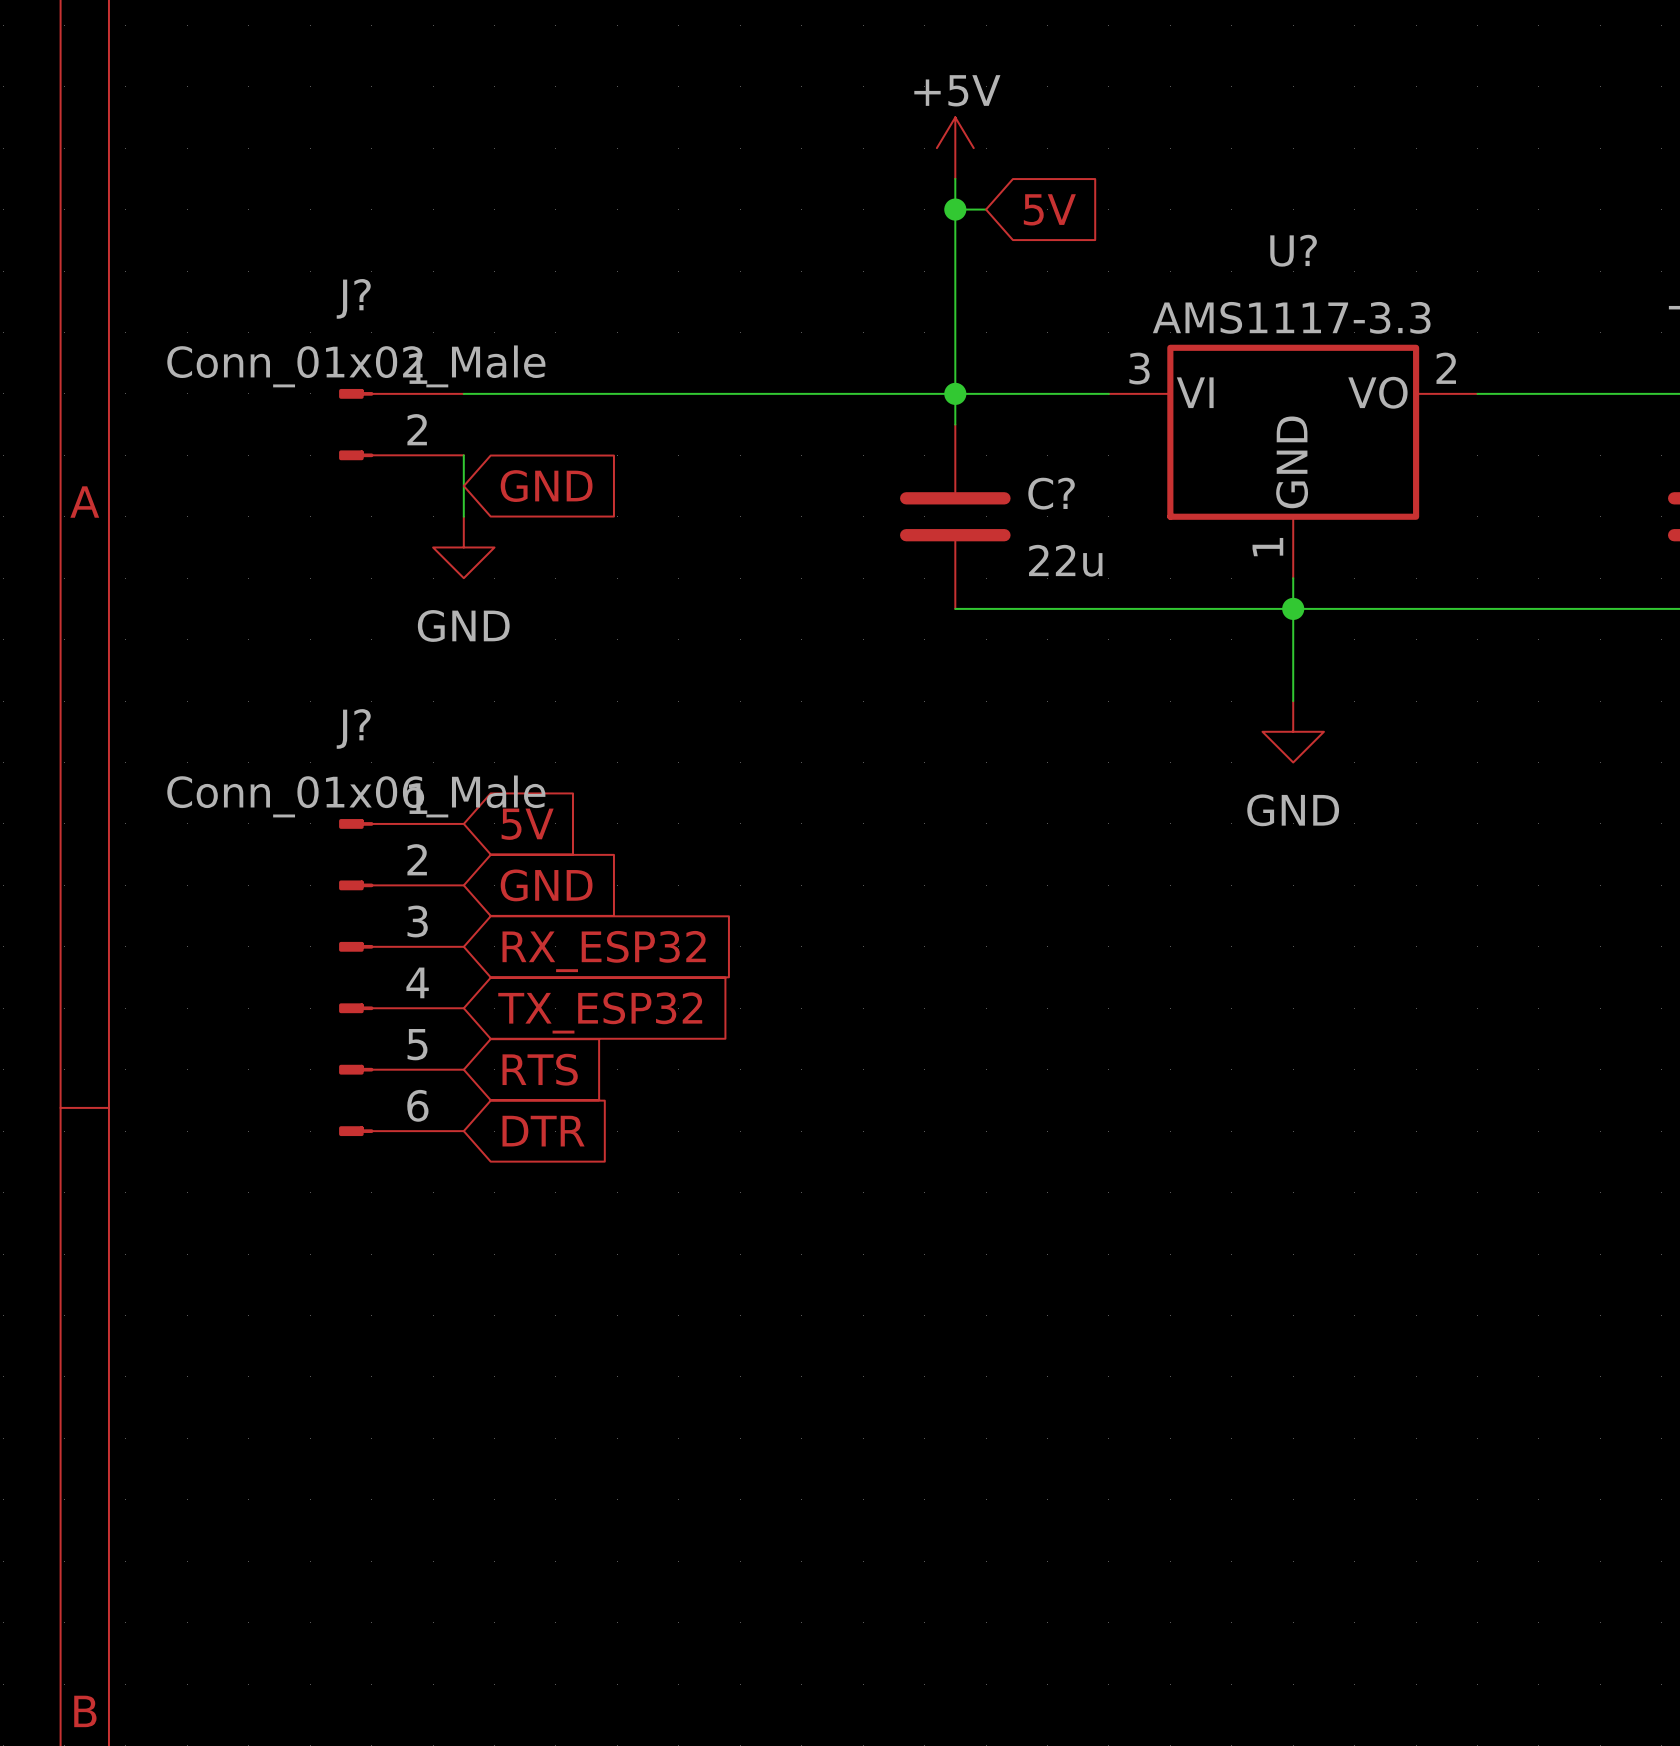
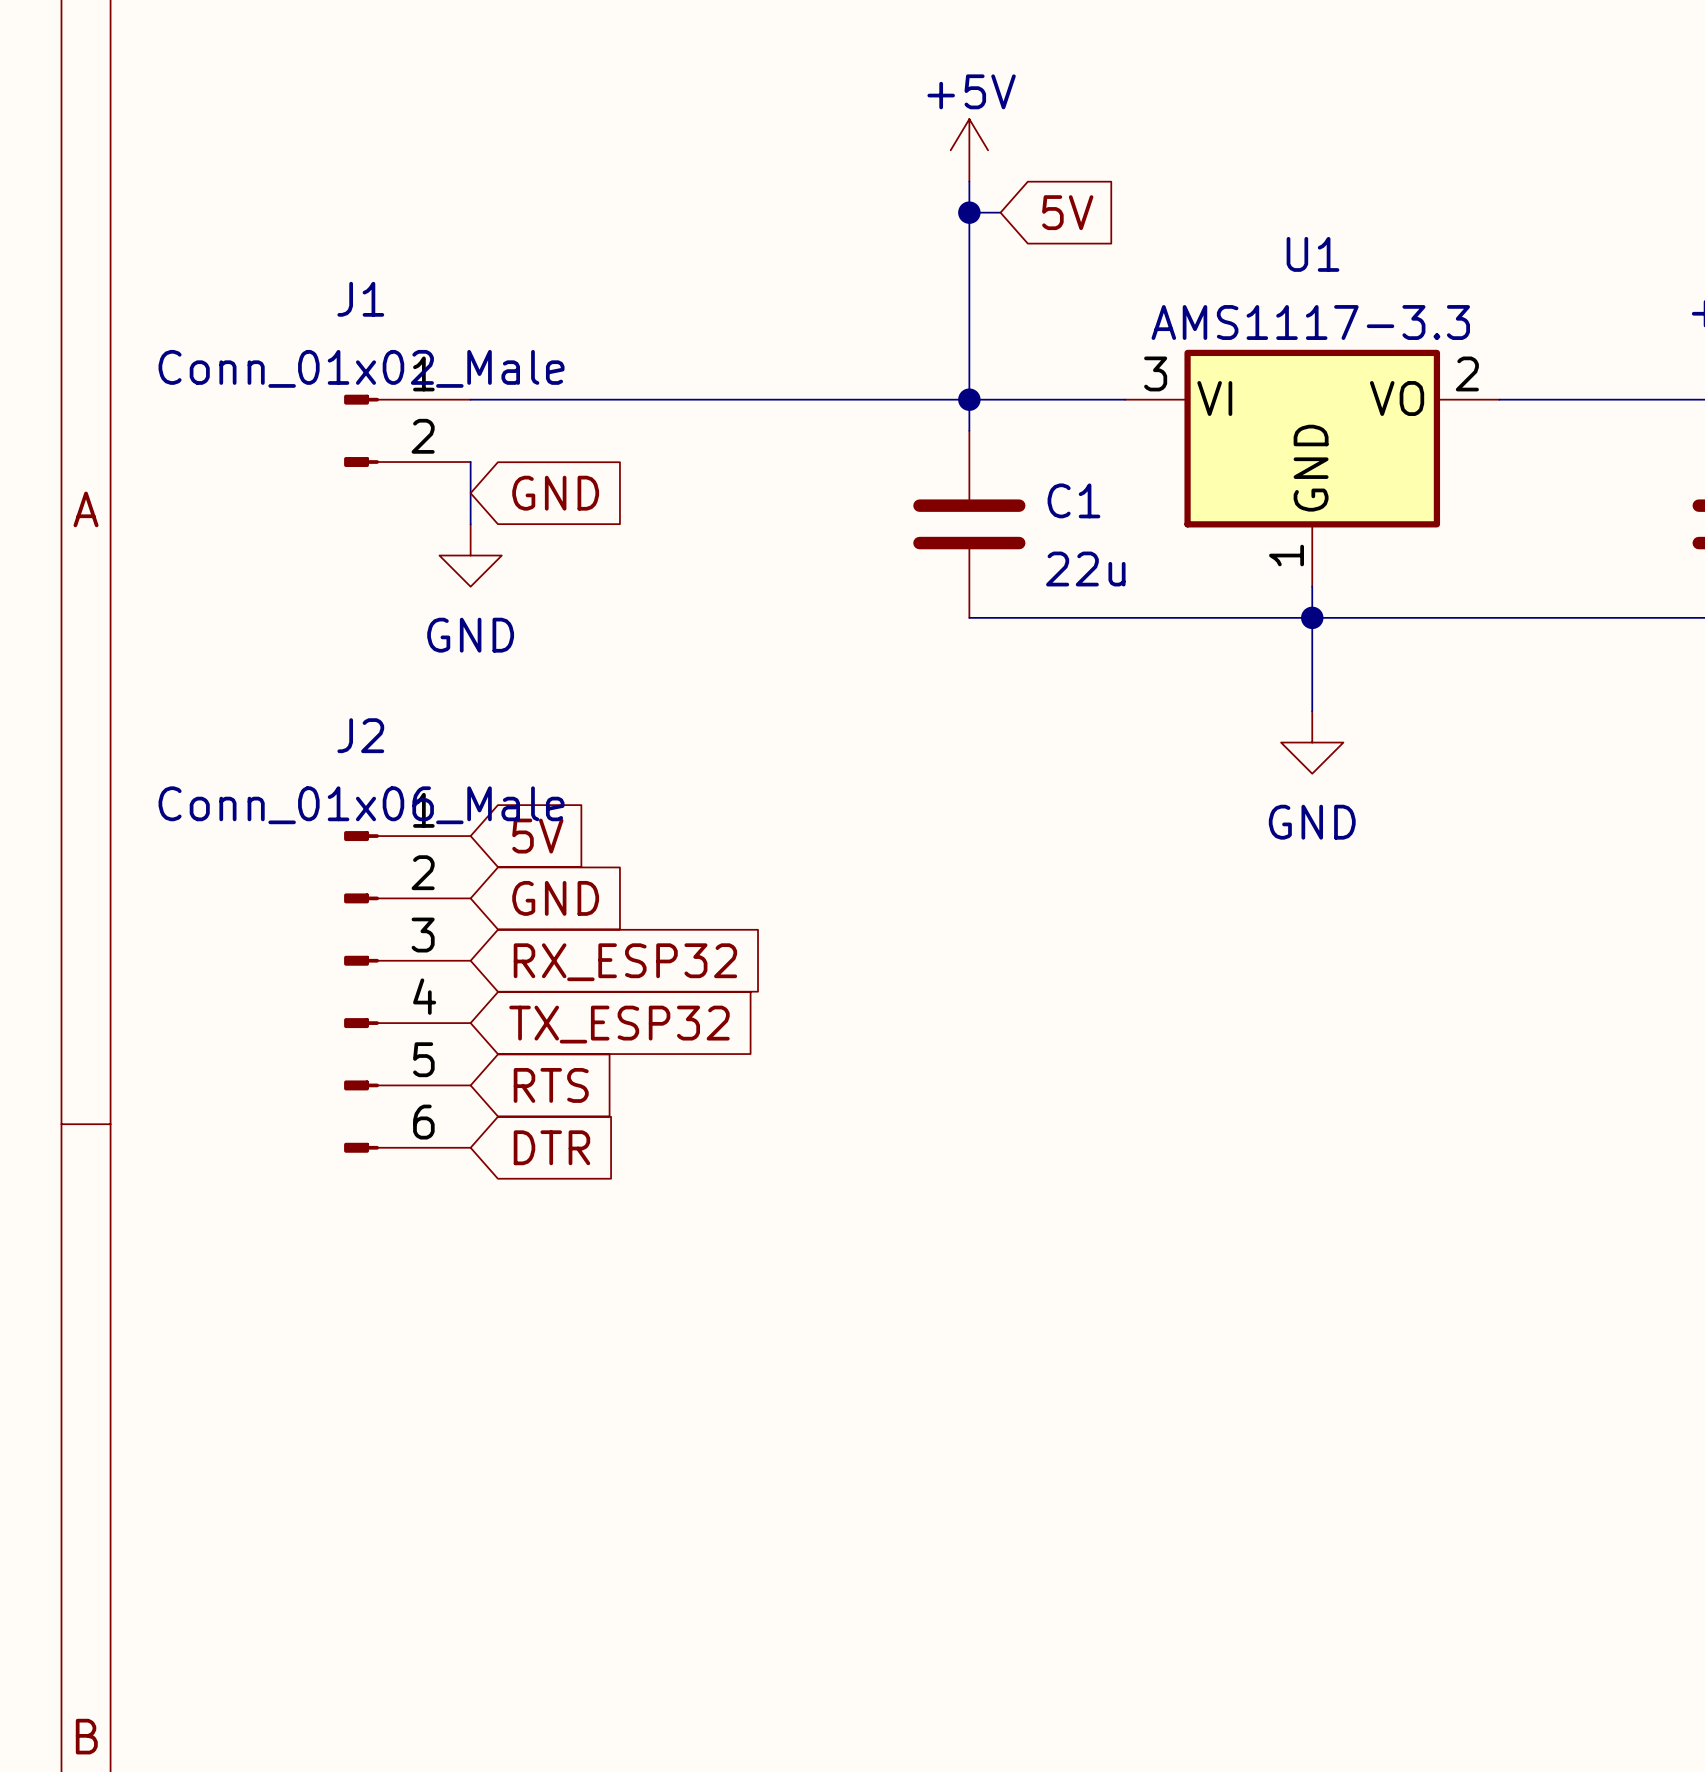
U? name: U? (1293, 250) -> U1 (1312, 254)
J? name: J? (353, 298) -> J1 (360, 299)
C? name: C? (1051, 493) -> C1 (1073, 500)
J? name: J? (353, 728) -> J2 (360, 735)

